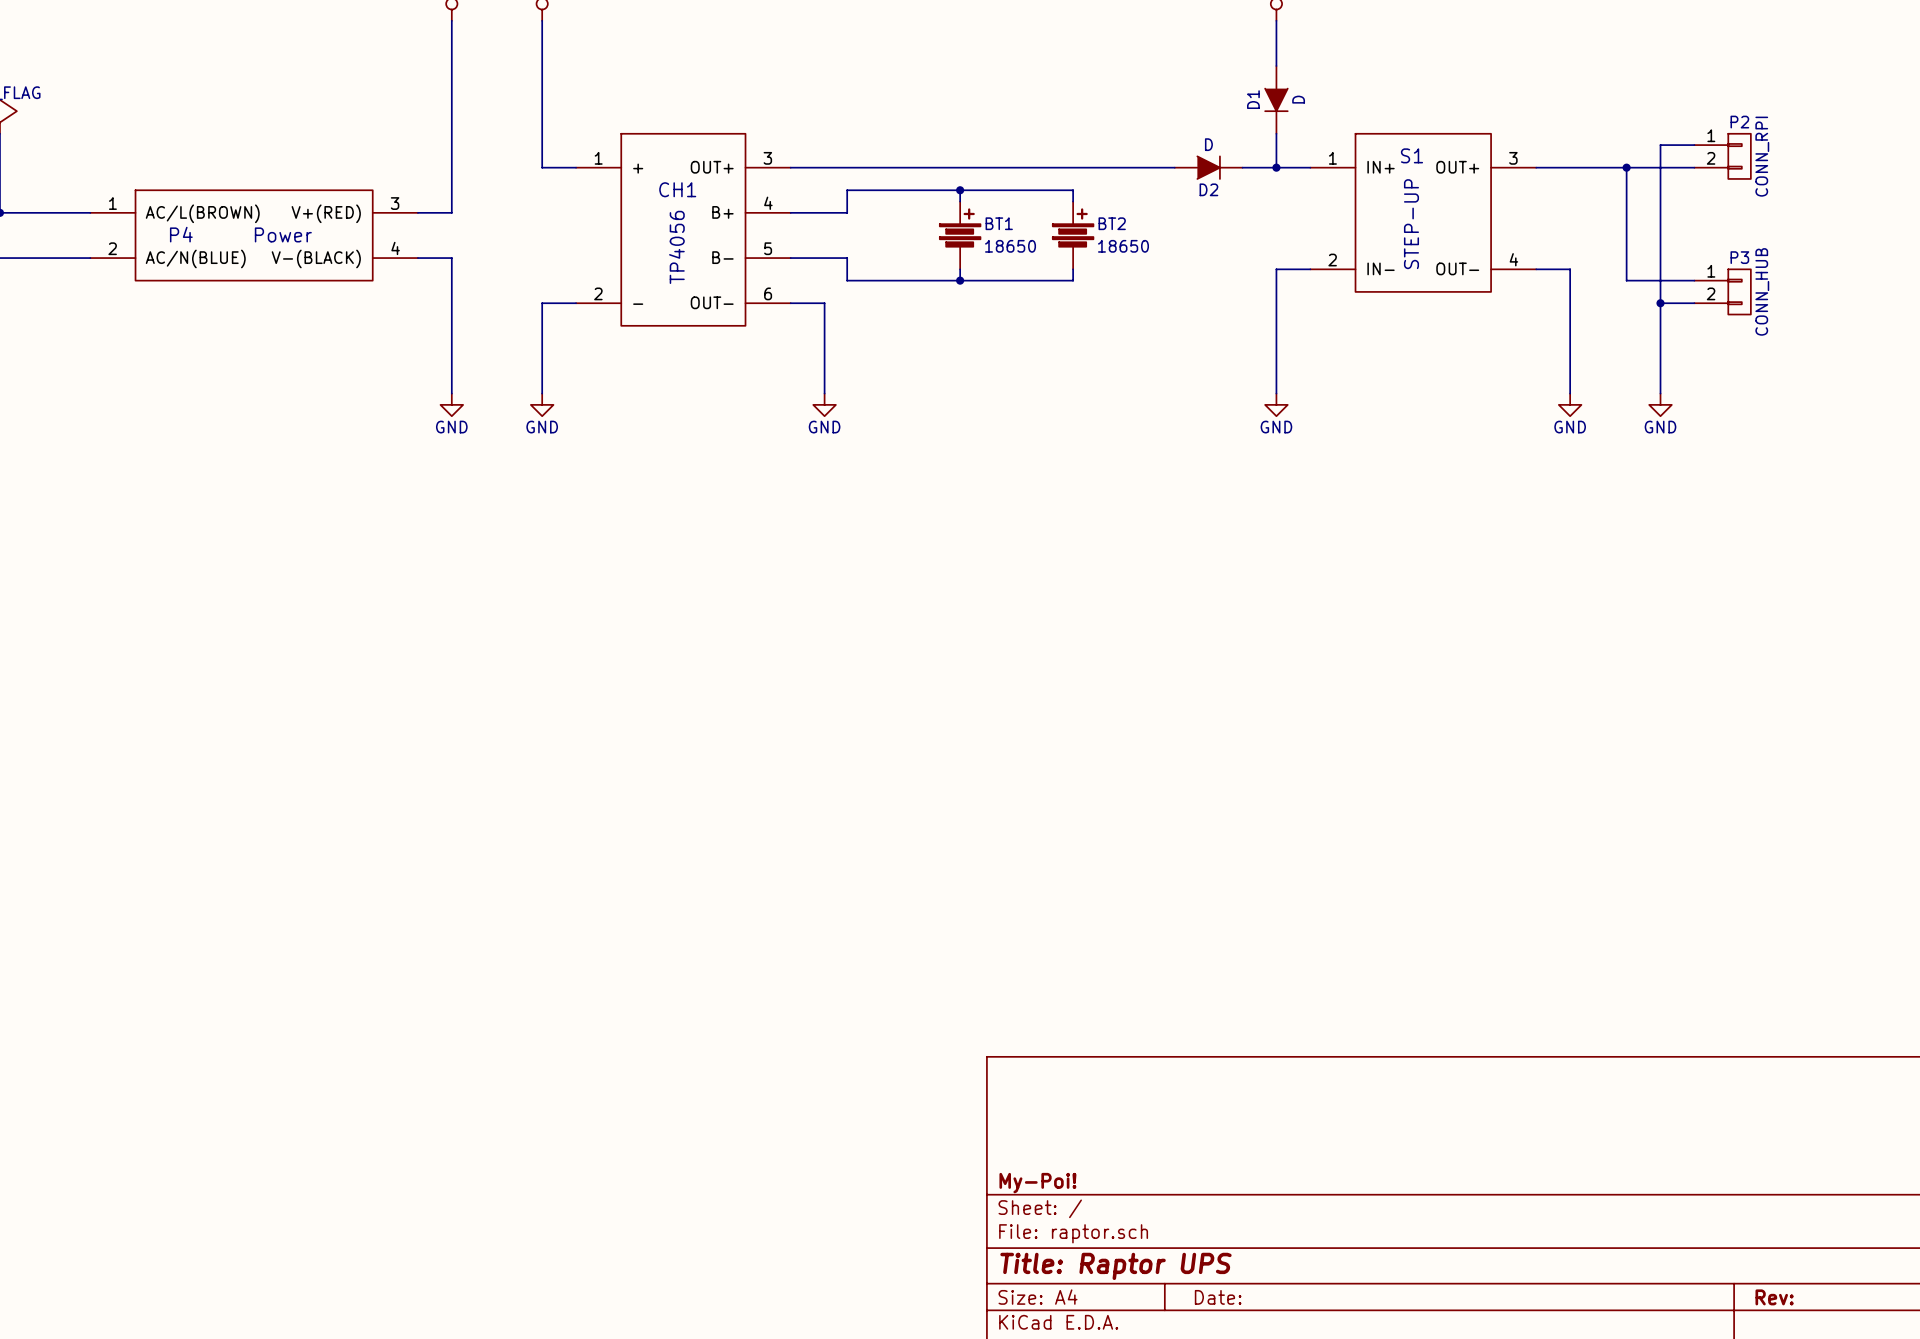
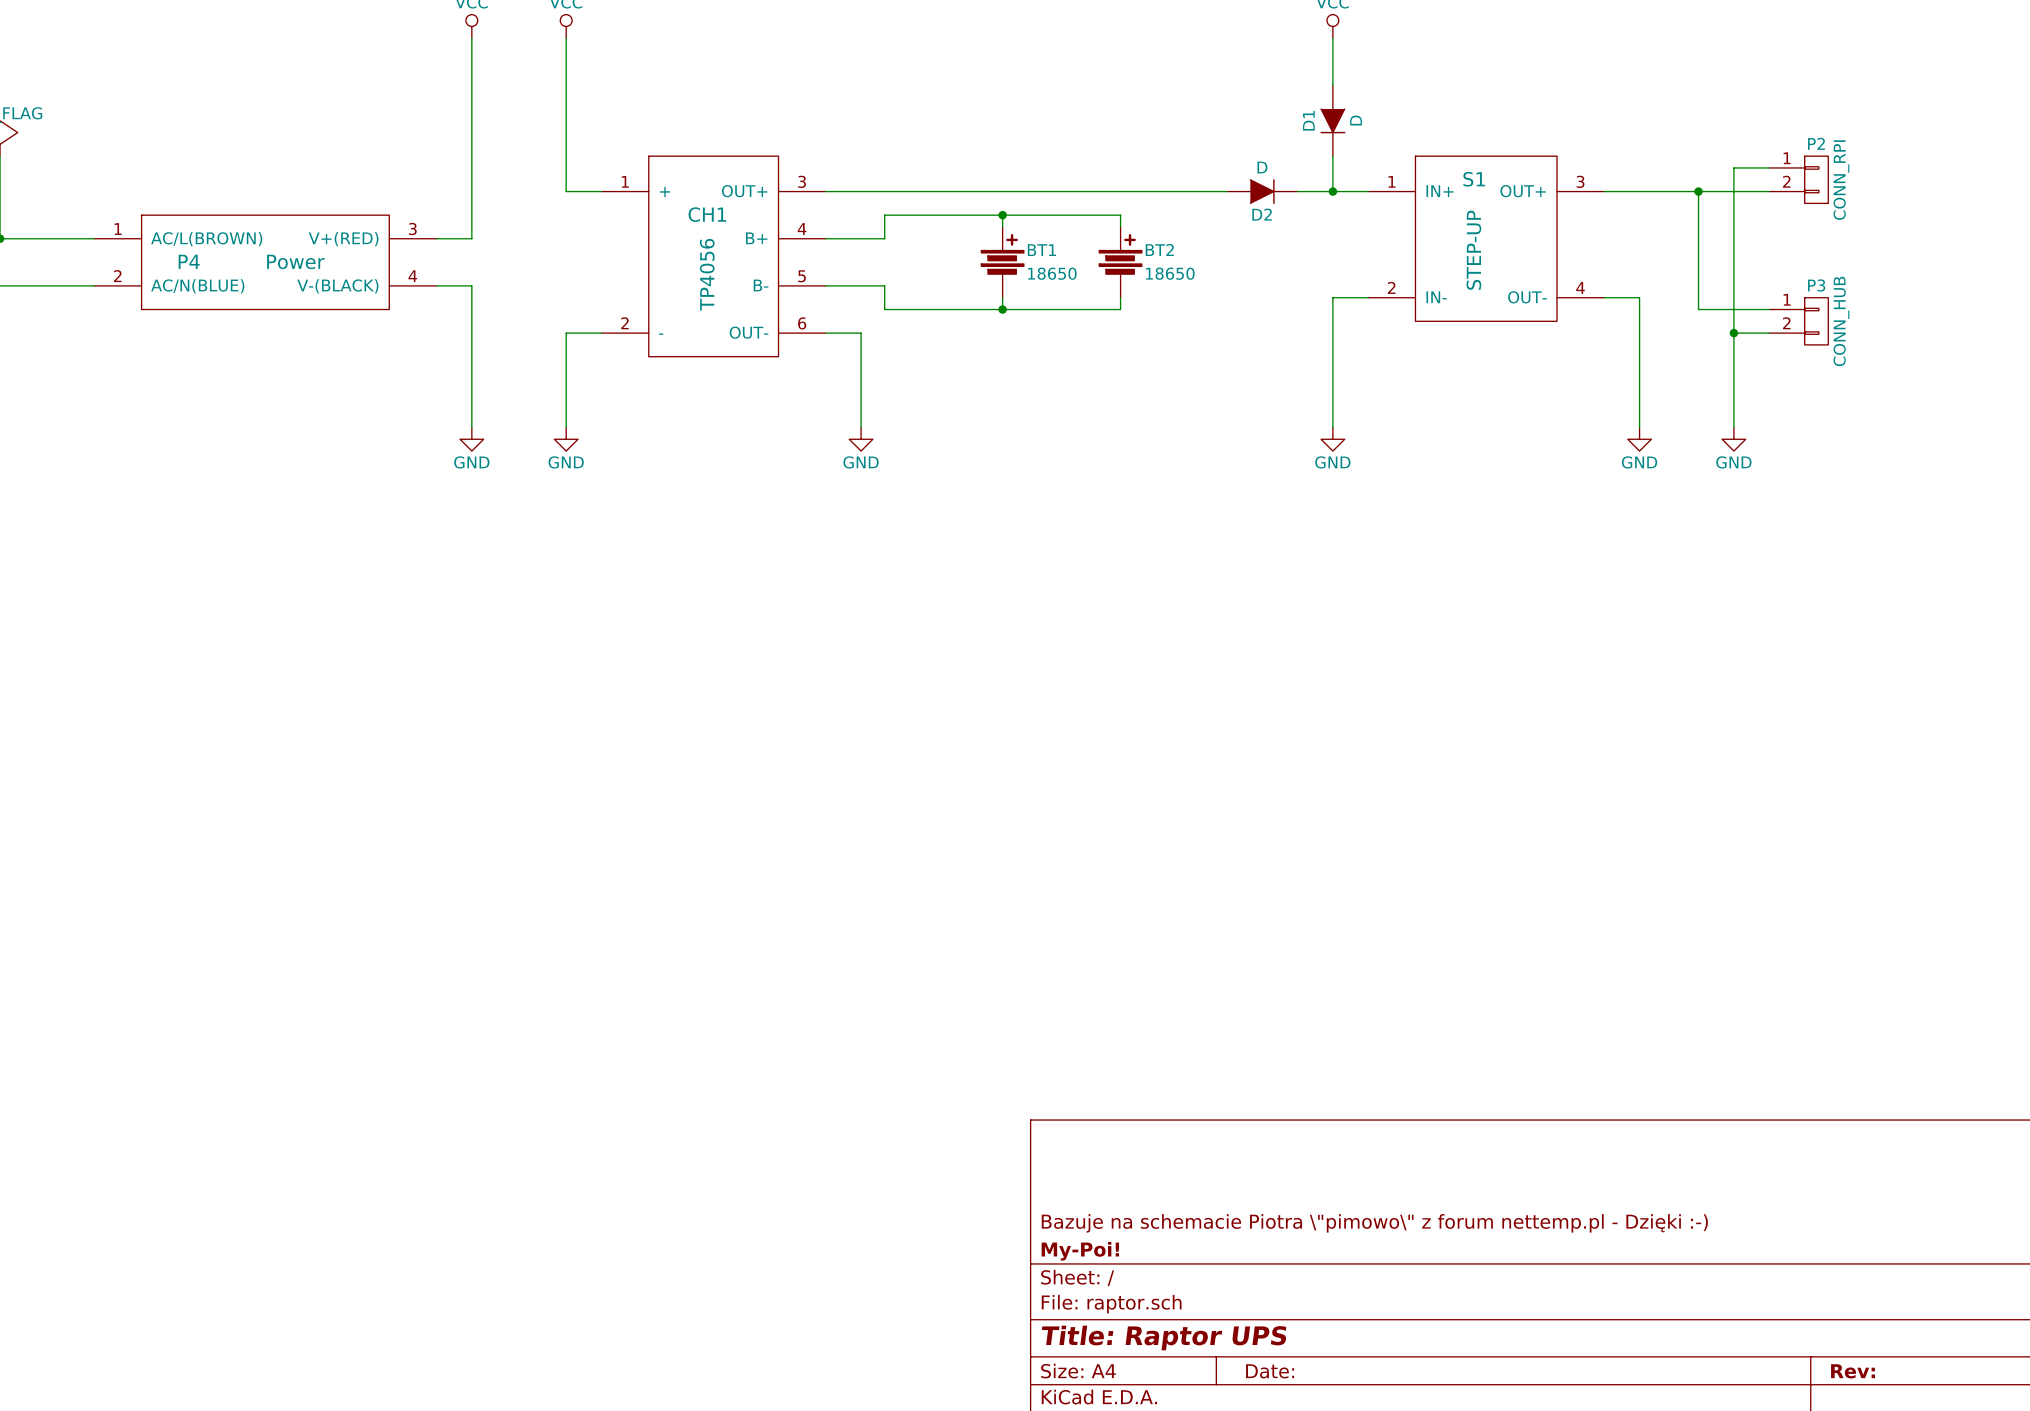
title block: none -> Bazuje na schemacie Piotra \"pimowo\" z forum nettemp.pl - Dzięki :-) (1374, 1223)

